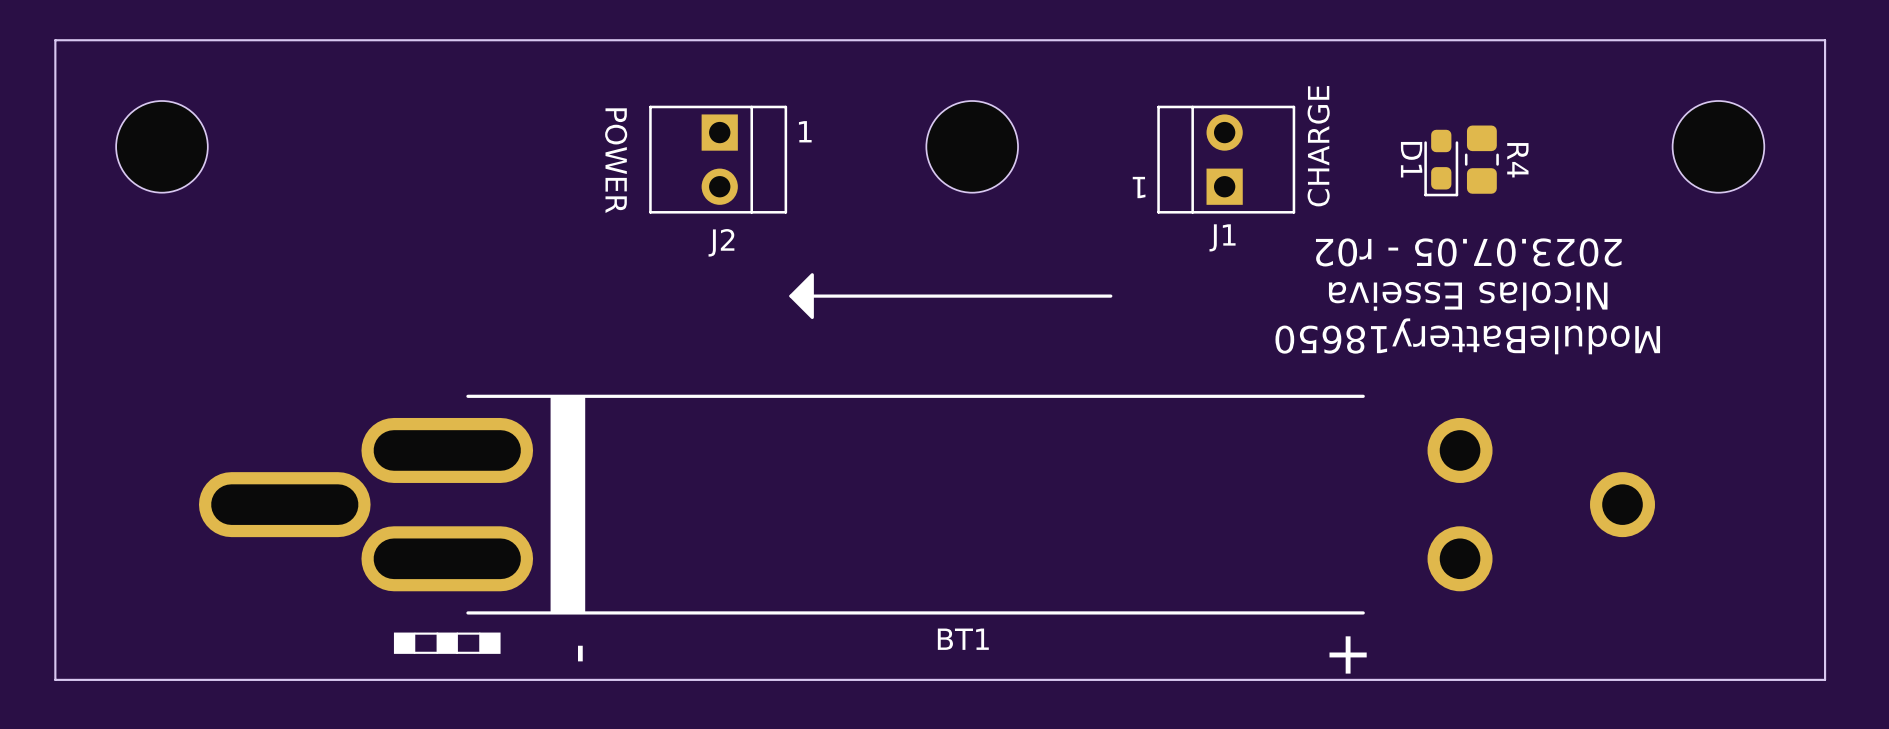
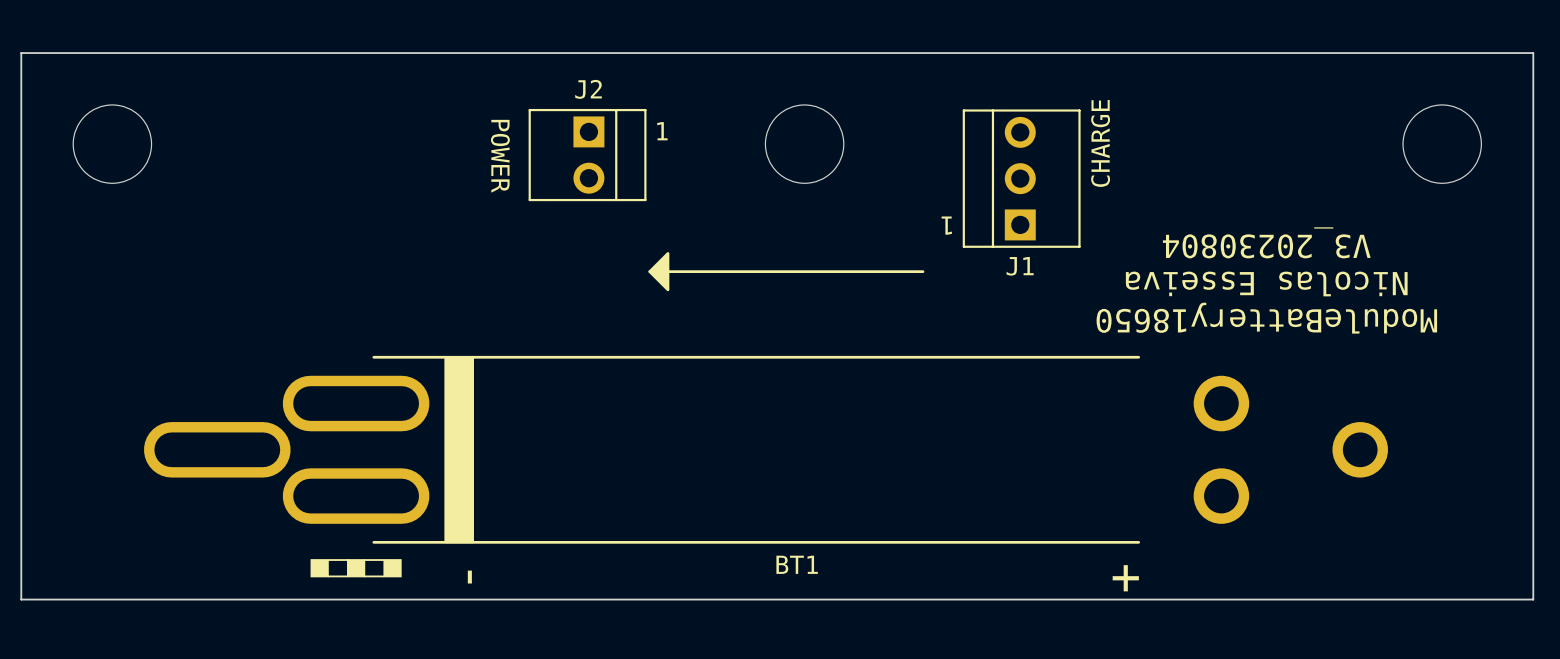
J1 footprint: [1157, 105, 1296, 214] -> [962, 109, 1081, 248]
R4: (1481, 159) -> none
D1: (1441, 163) -> none
J2 name position: J2 (721, 242) -> J2 (588, 89)
text: 2023.07.05 - r02 (1468, 252) -> none
text: none -> V3_20230804 (1266, 242)
text position: Nicolas Esseiva (1468, 296) -> Nicolas Esseiva (1266, 283)
text position: ModuleBattery18650 (1467, 336) -> ModuleBattery18650 (1266, 318)

